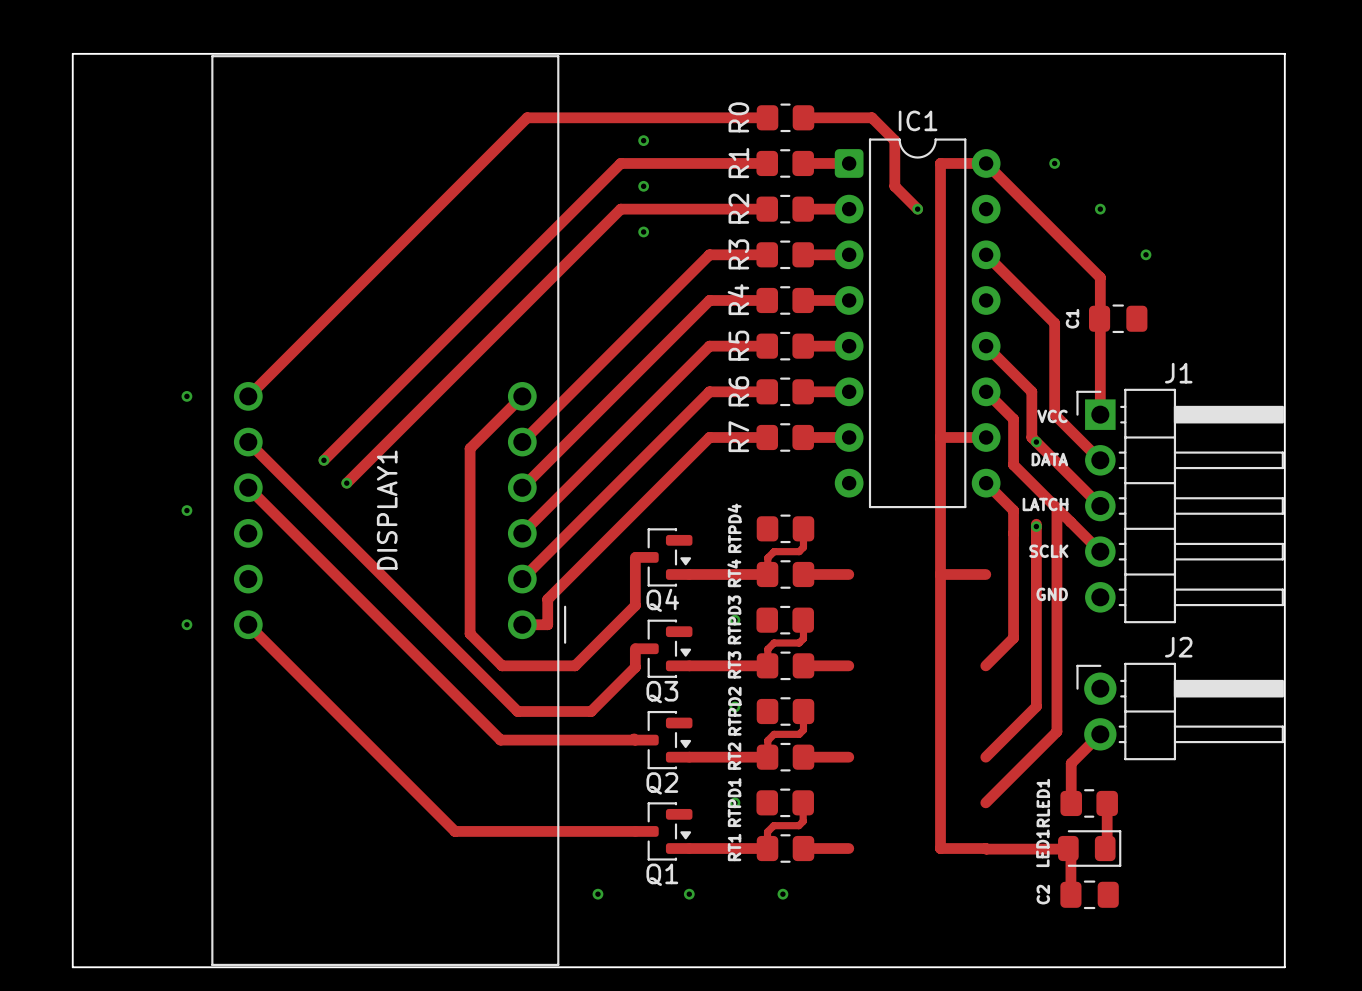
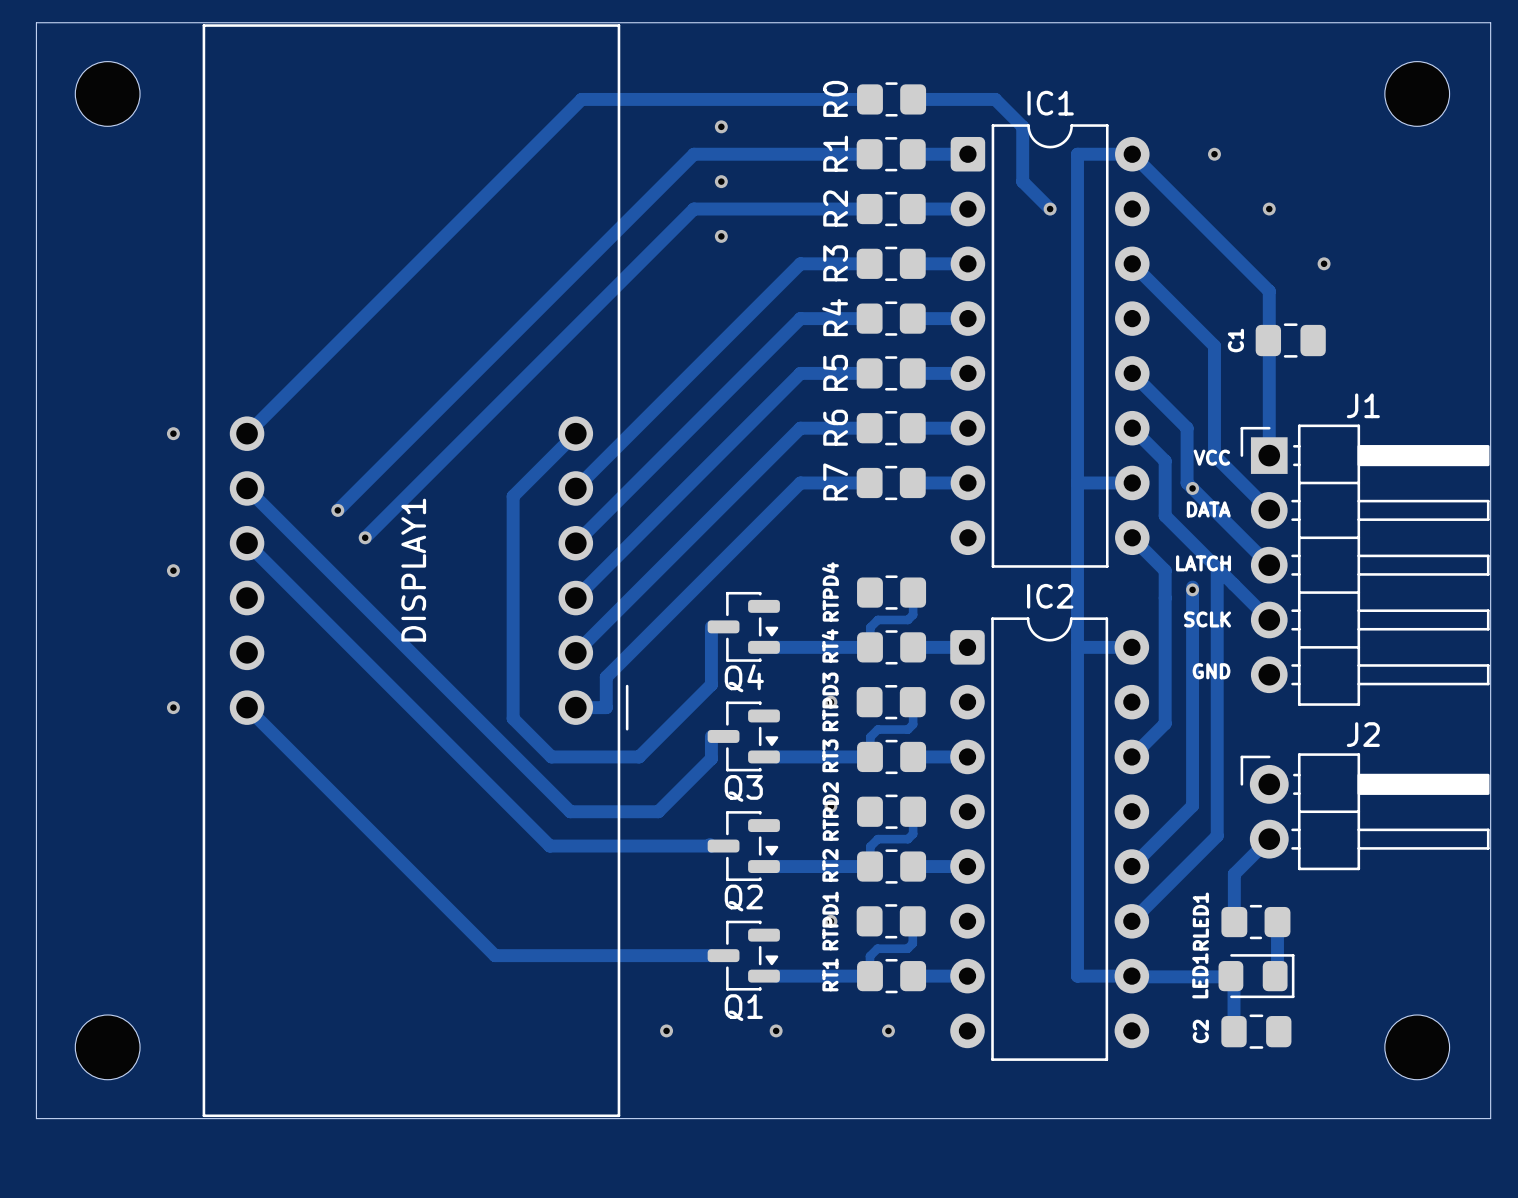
part: none -> (107, 93)
part: none -> (1417, 93)
IC2: none -> (1049, 839)
part: none -> (107, 1047)
part: none -> (1417, 1047)

